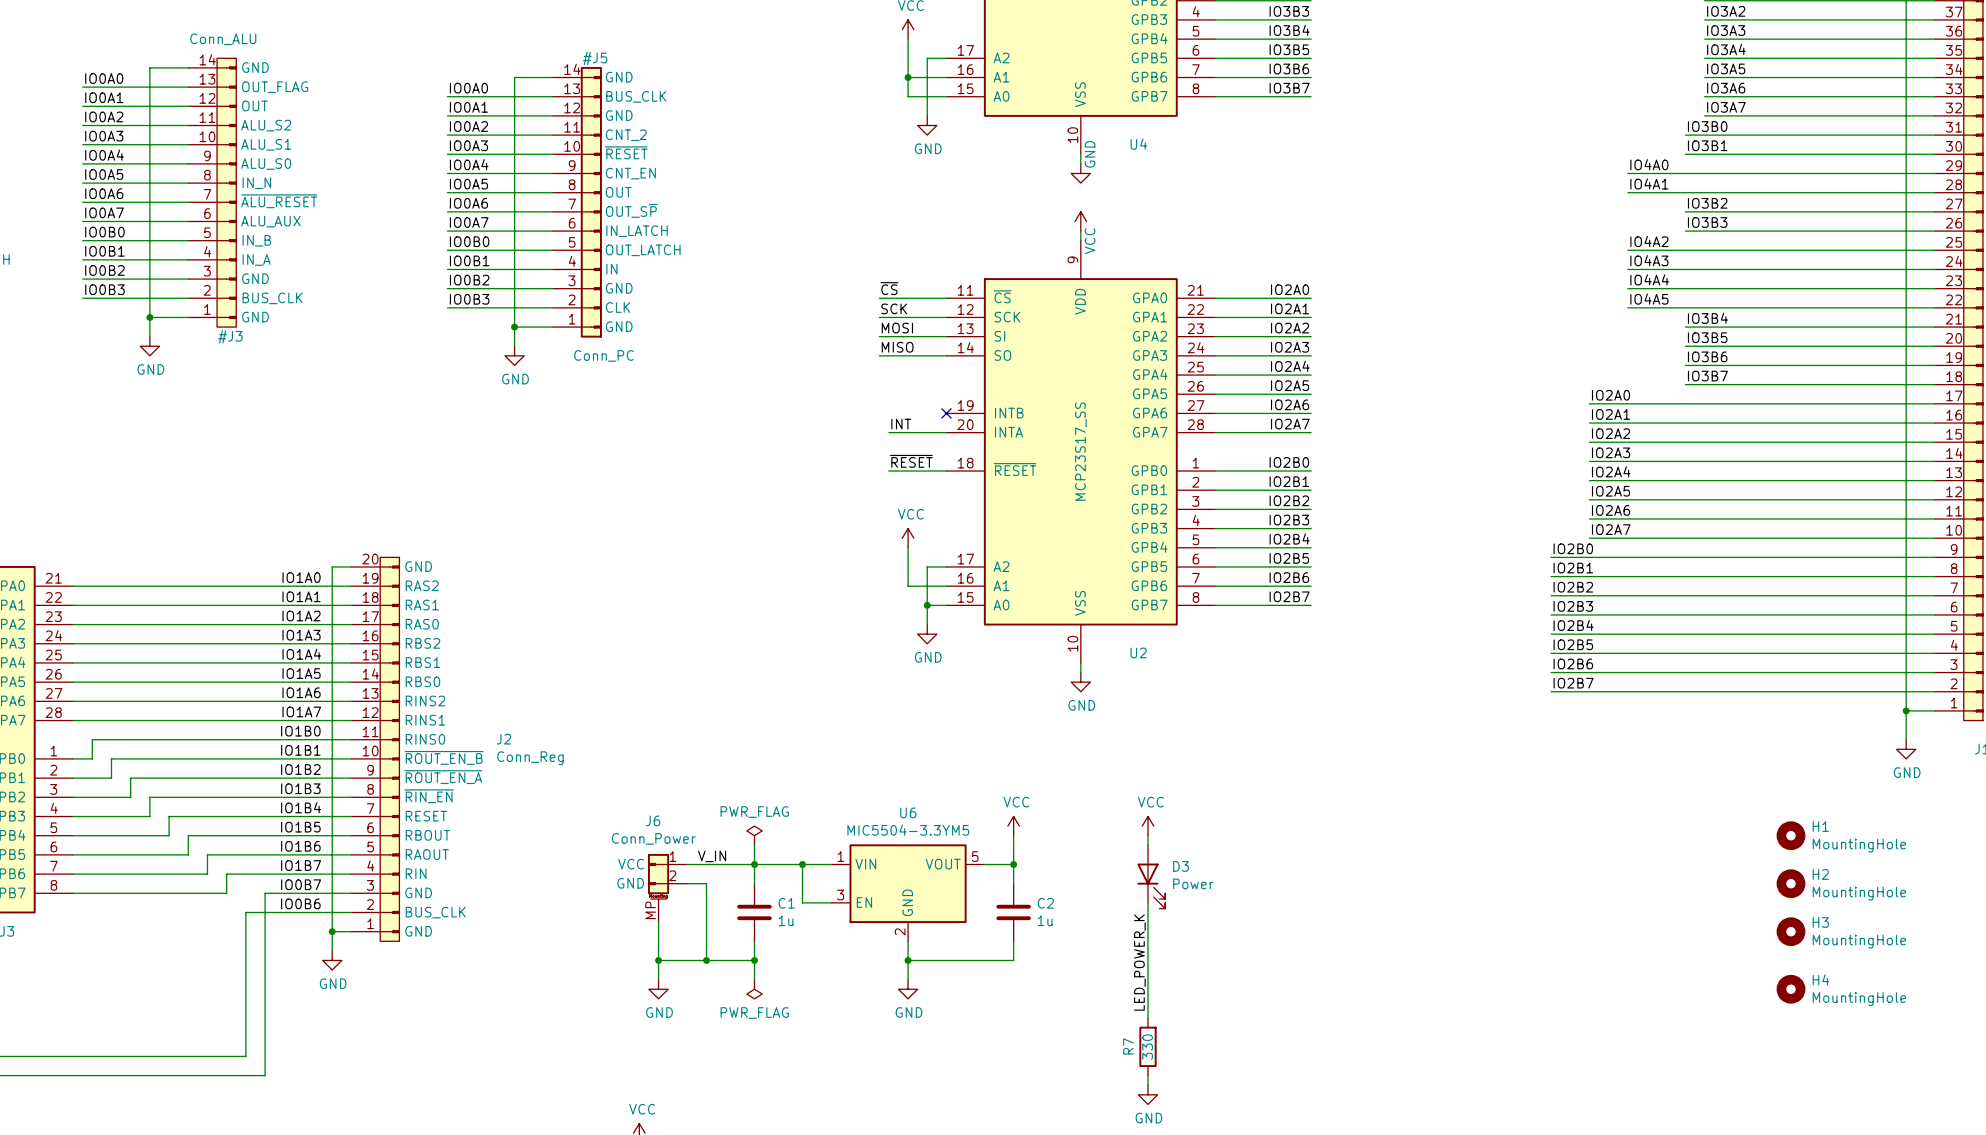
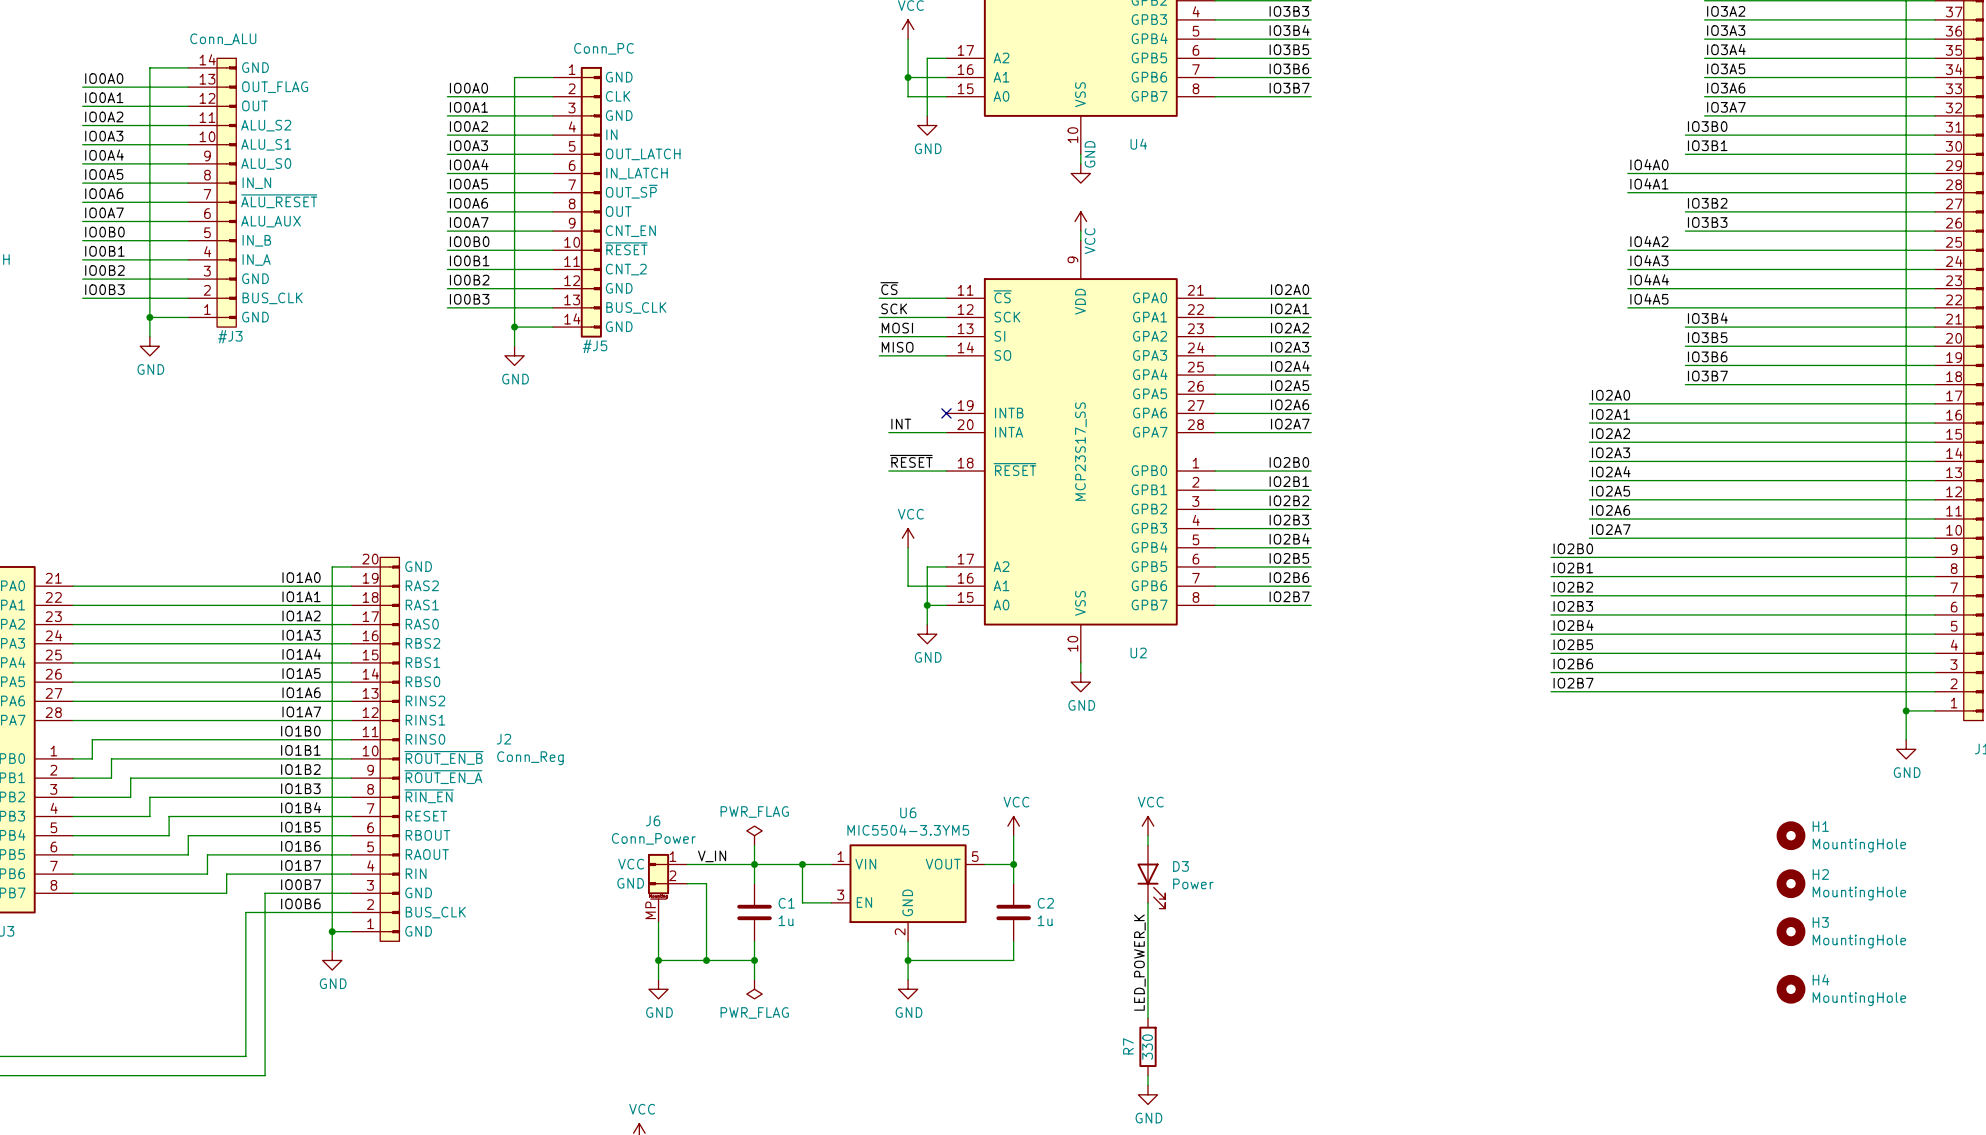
#J5 flip: as is (591, 202) -> up-down (591, 202)

